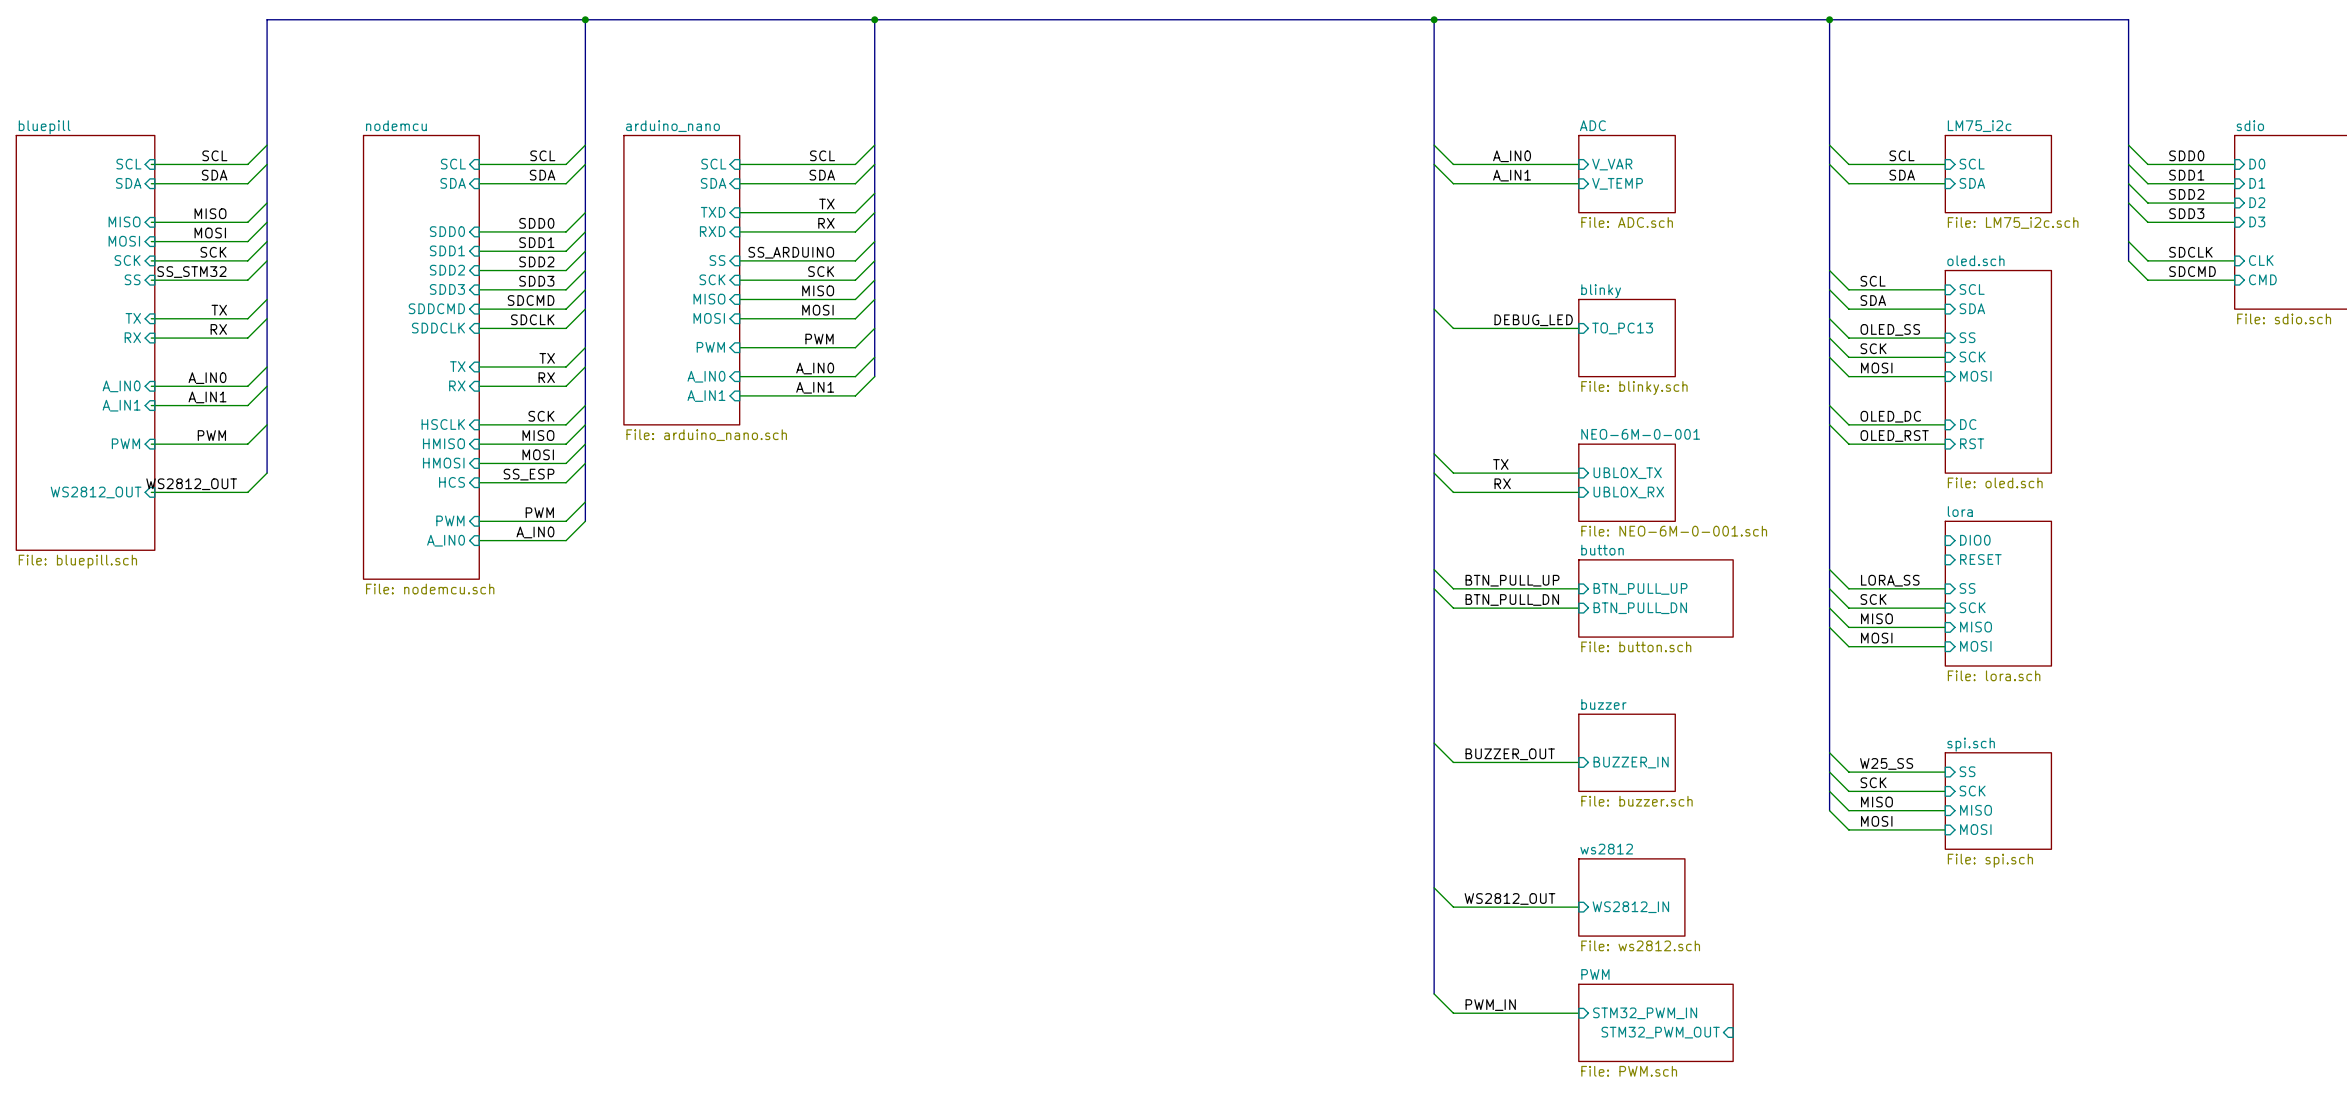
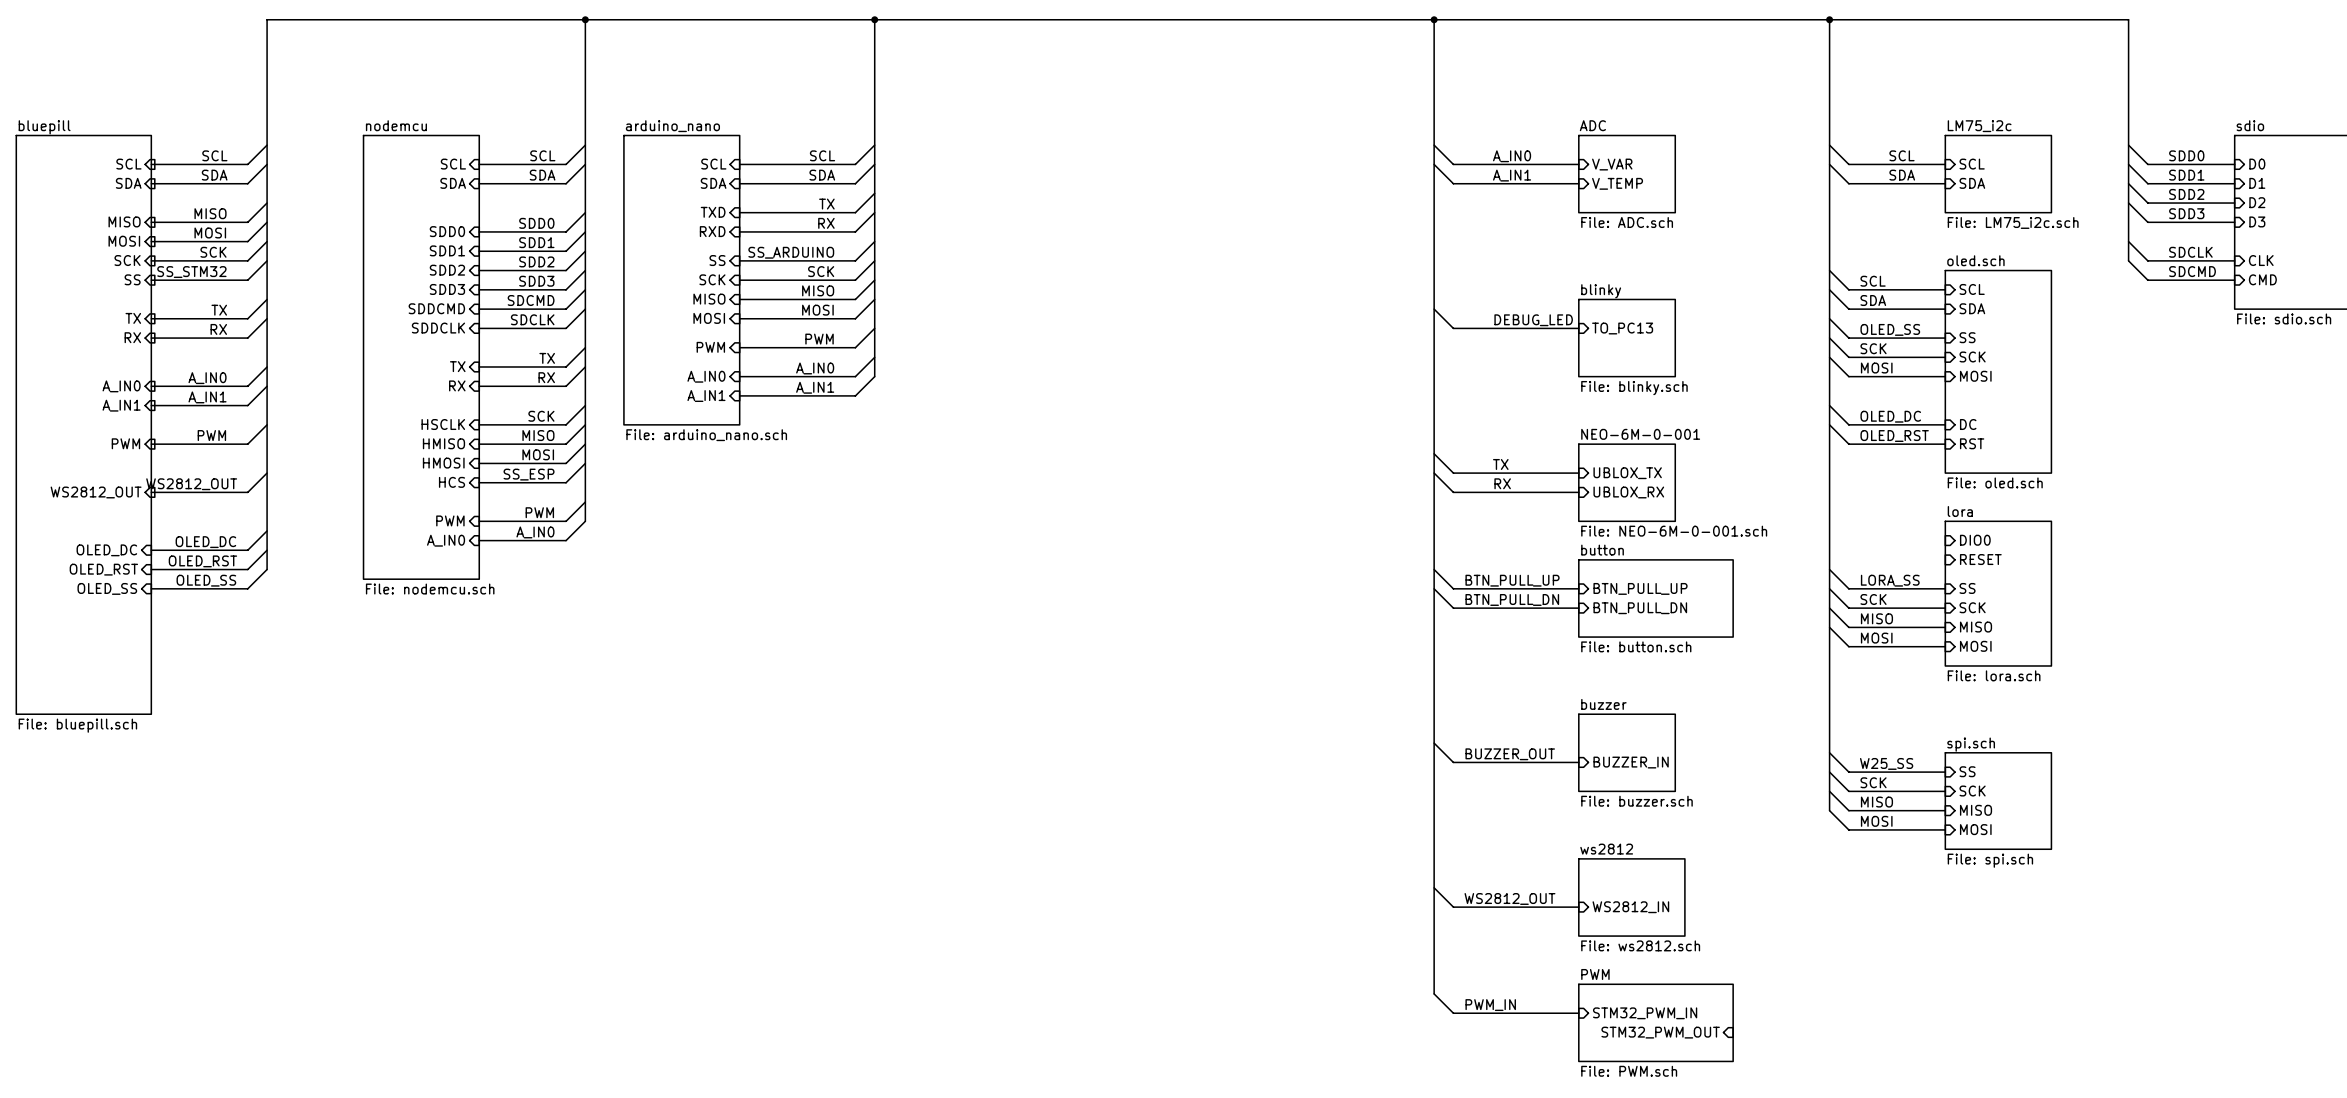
sheet bluepill: File: bluepill.sch (85, 342) -> none
sheet bluepill: none -> File: bluepill.sch (83, 424)
bus: none -> (267, 473) (267, 569)
wire: none -> (267, 530) (247, 550) (151, 550)
label: none -> OLED_DC (205, 542)
sheet pin: none -> OLED_DC (106, 550)
wire: none -> (267, 550) (247, 569) (151, 569)
label: none -> OLED_RST (202, 561)
sheet pin: none -> OLED_RST (103, 569)
wire: none -> (267, 569) (247, 588) (151, 588)
label: none -> OLED_SS (206, 580)
sheet pin: none -> OLED_SS (107, 588)

